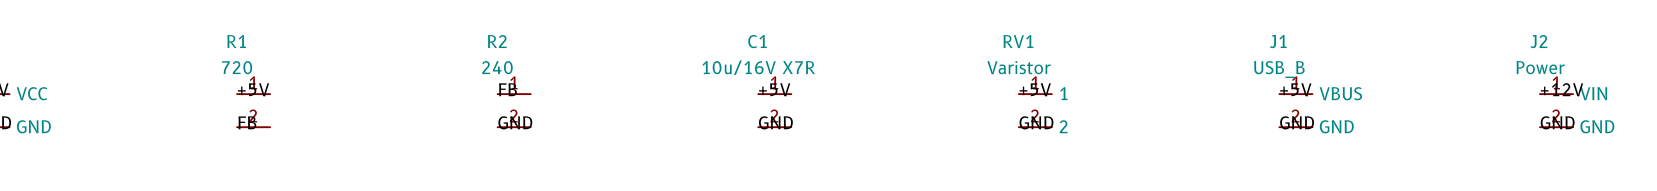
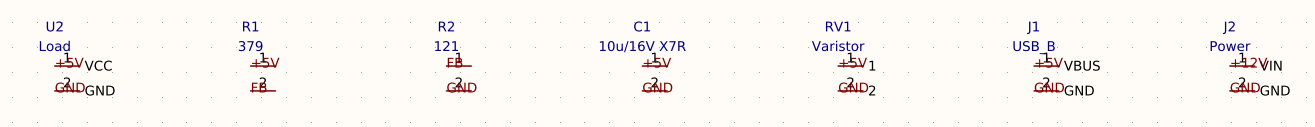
R1 value: 720 (237, 67) -> 379 (250, 46)
R2 value: 240 (497, 67) -> 121 (446, 46)

